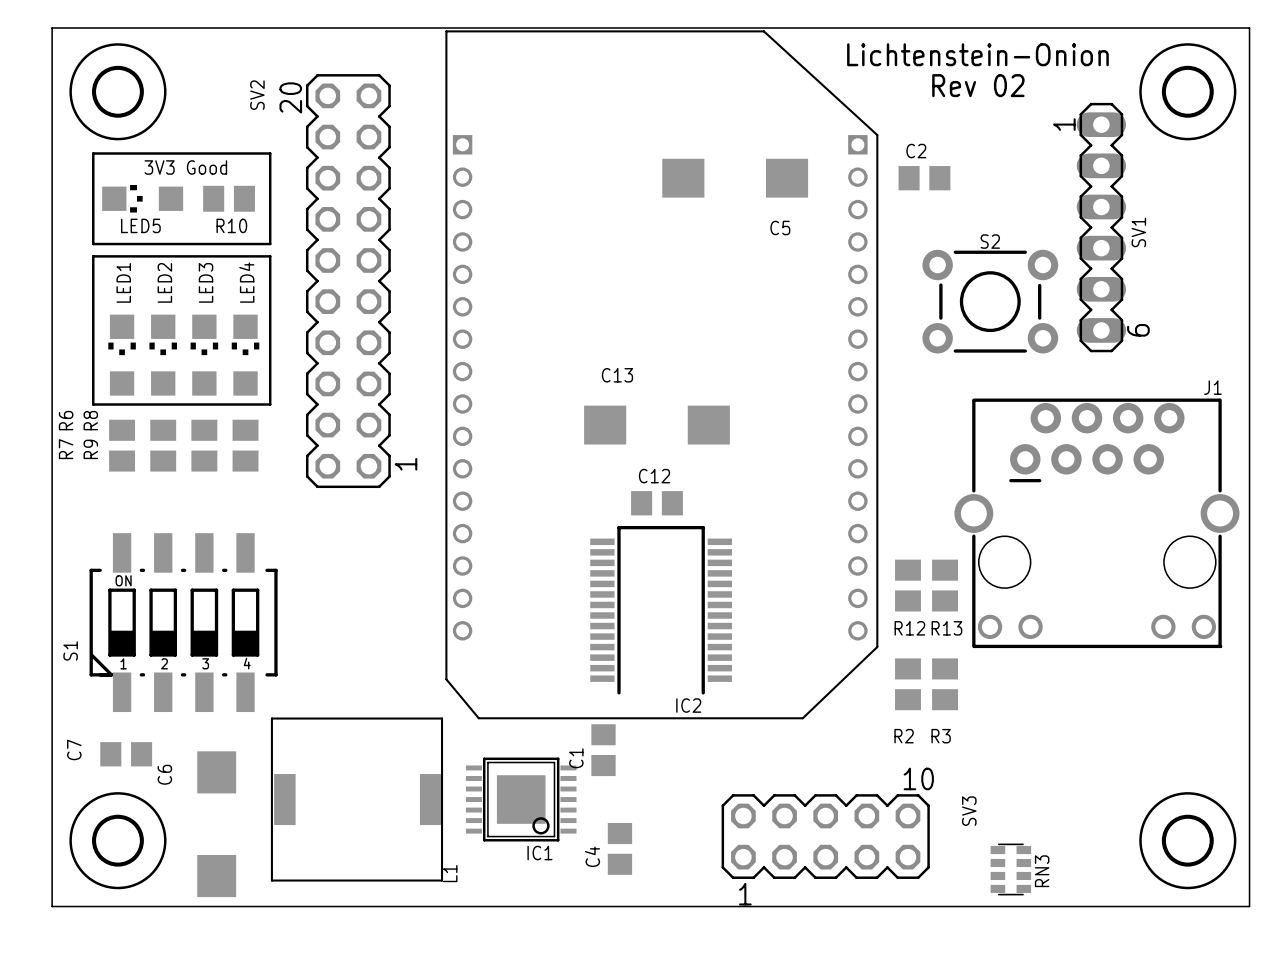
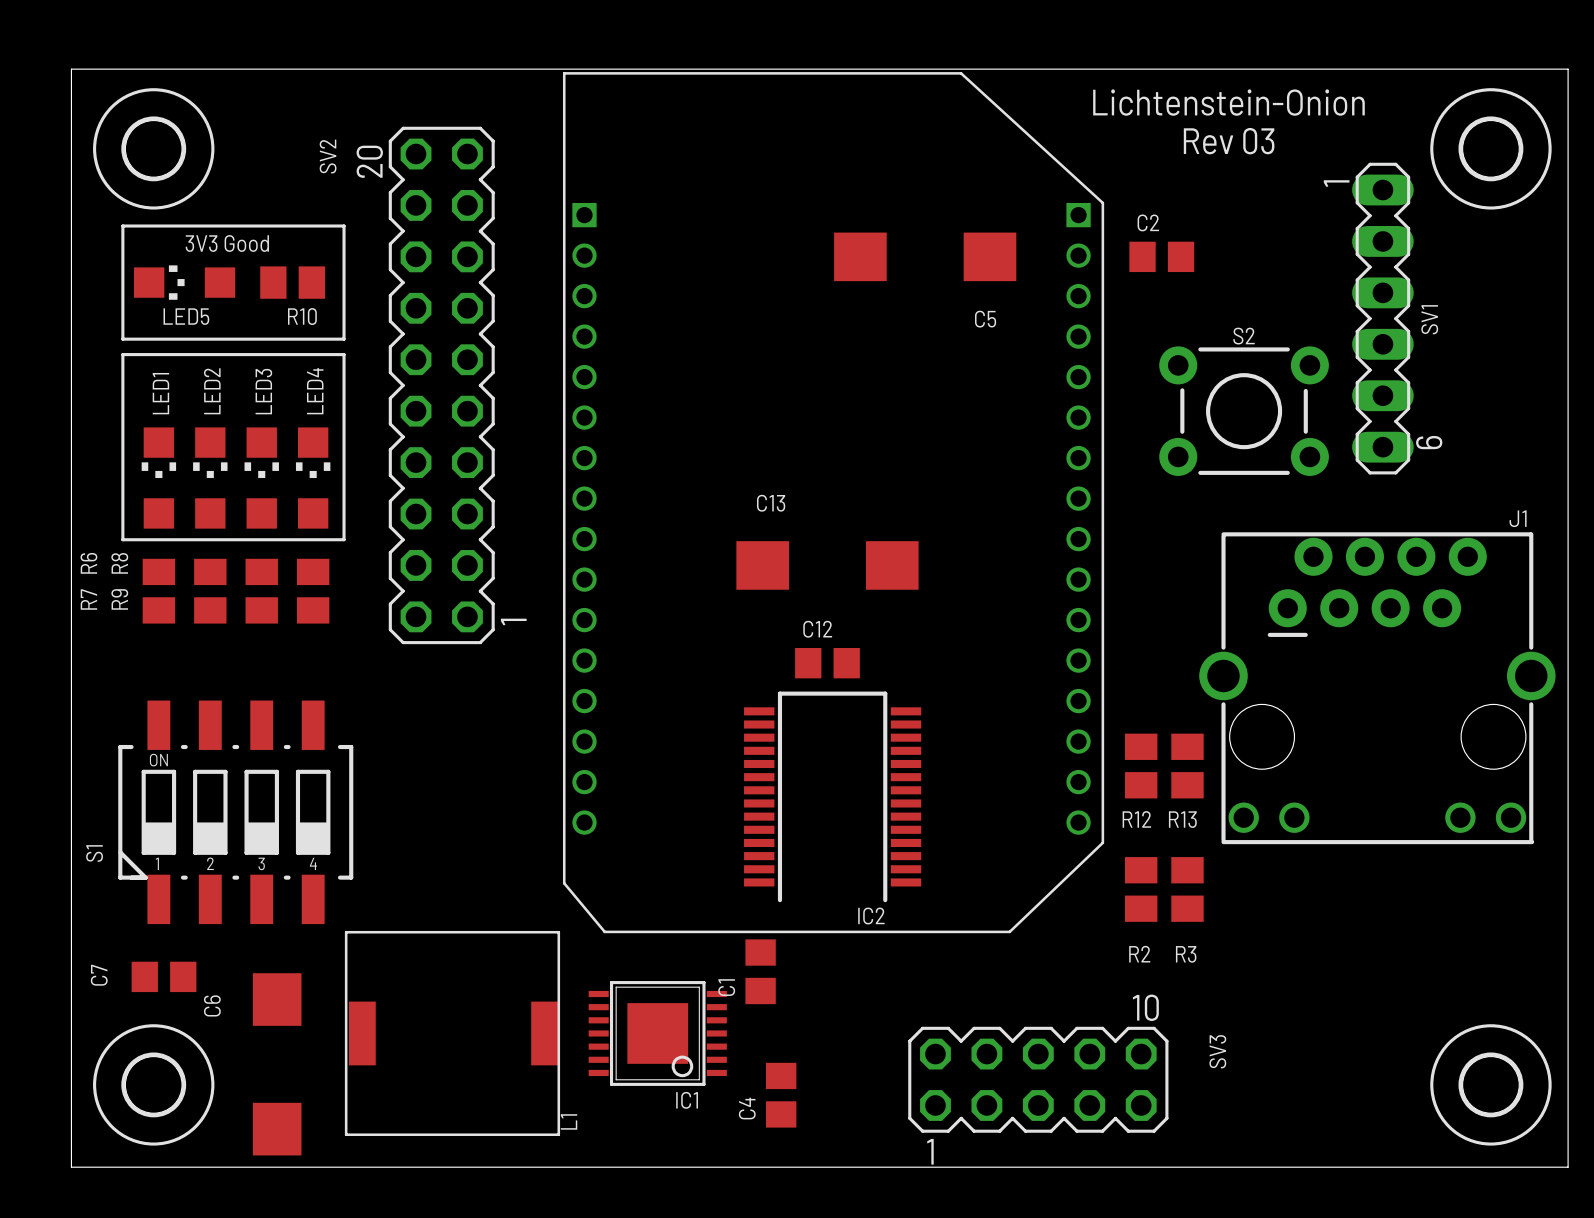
text: Rev 02 (978, 85) -> Rev 03 (1229, 141)
RN3: (1010, 869) -> none

